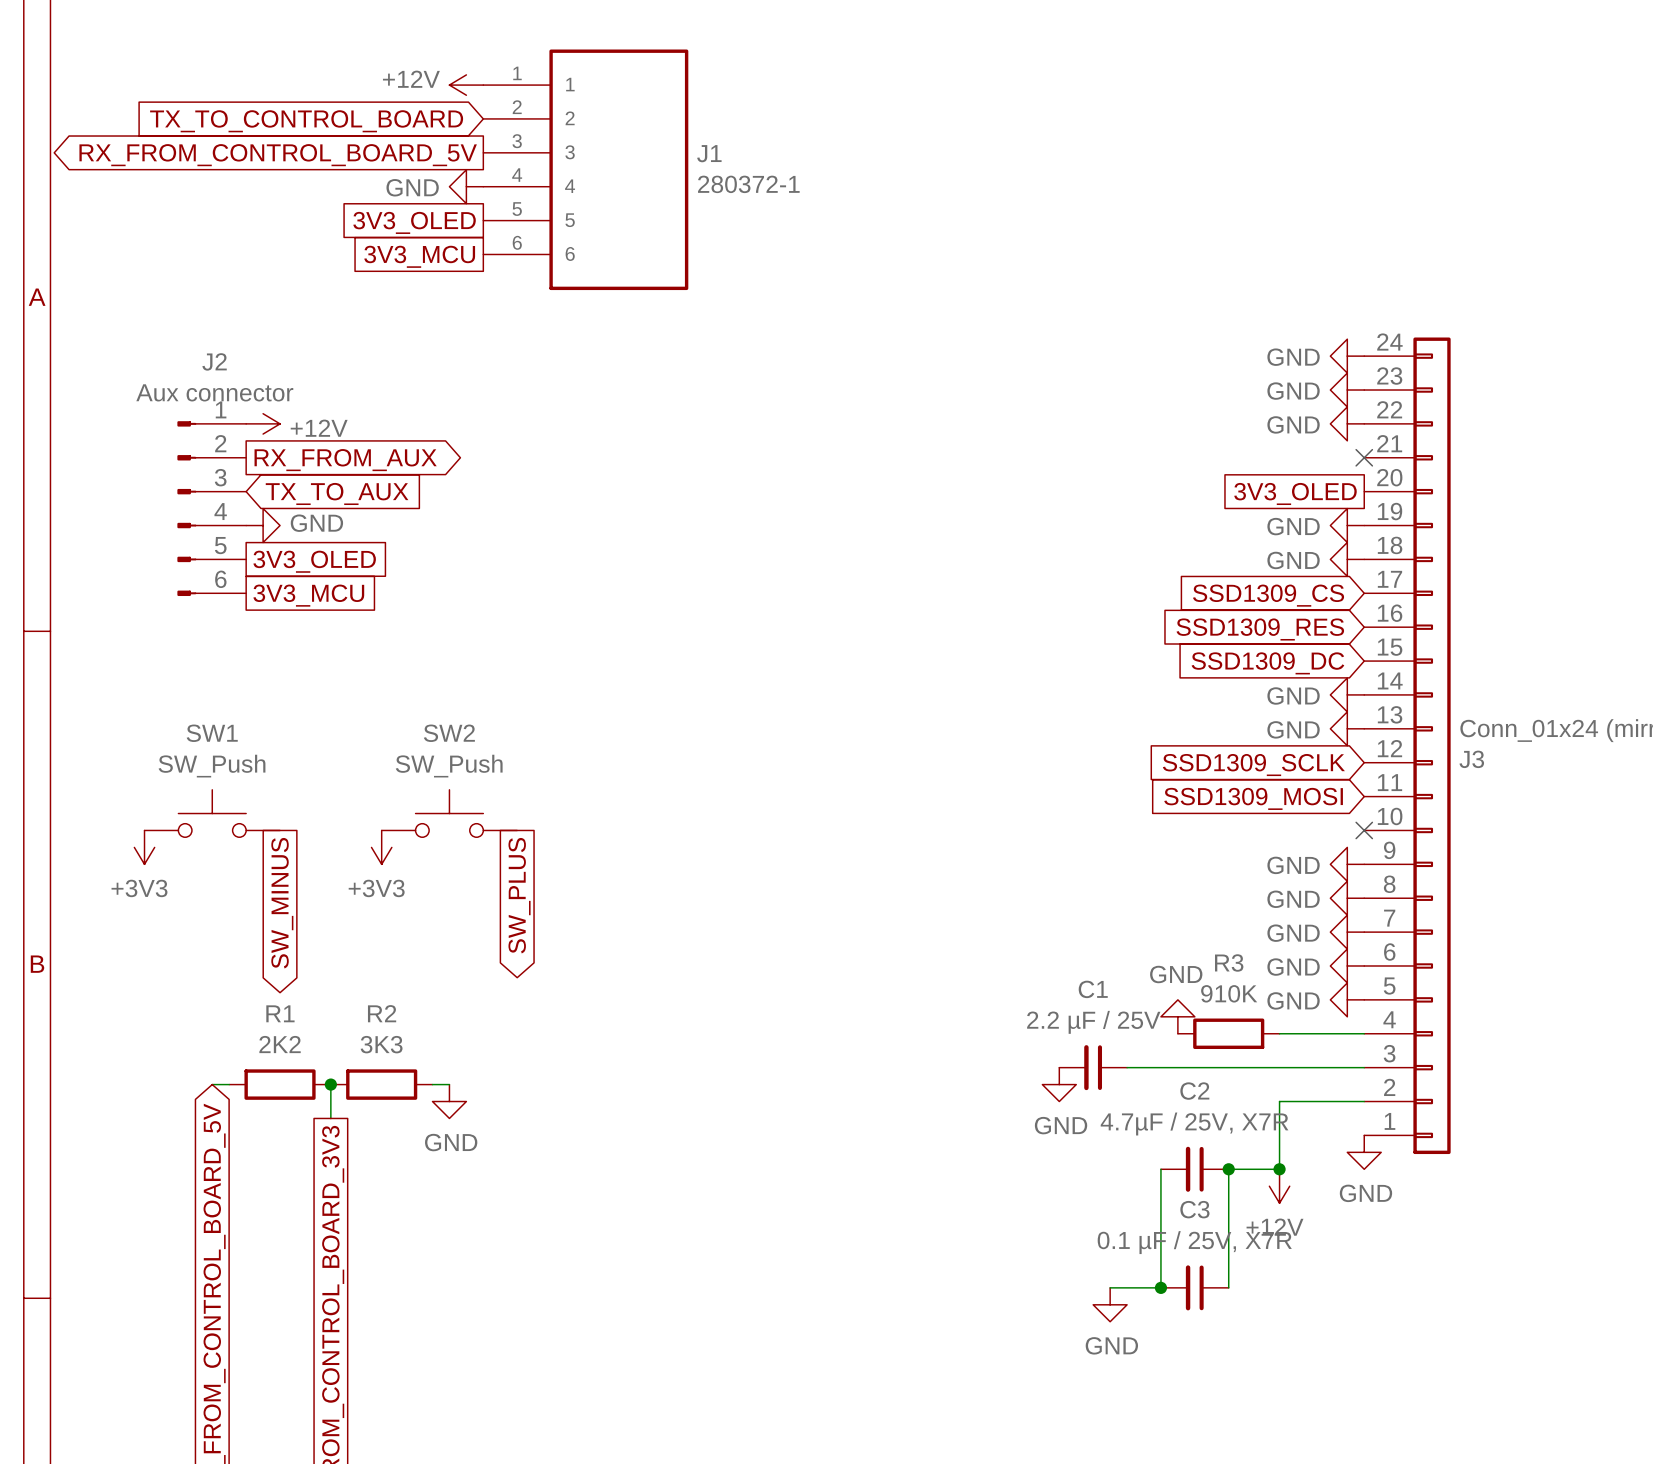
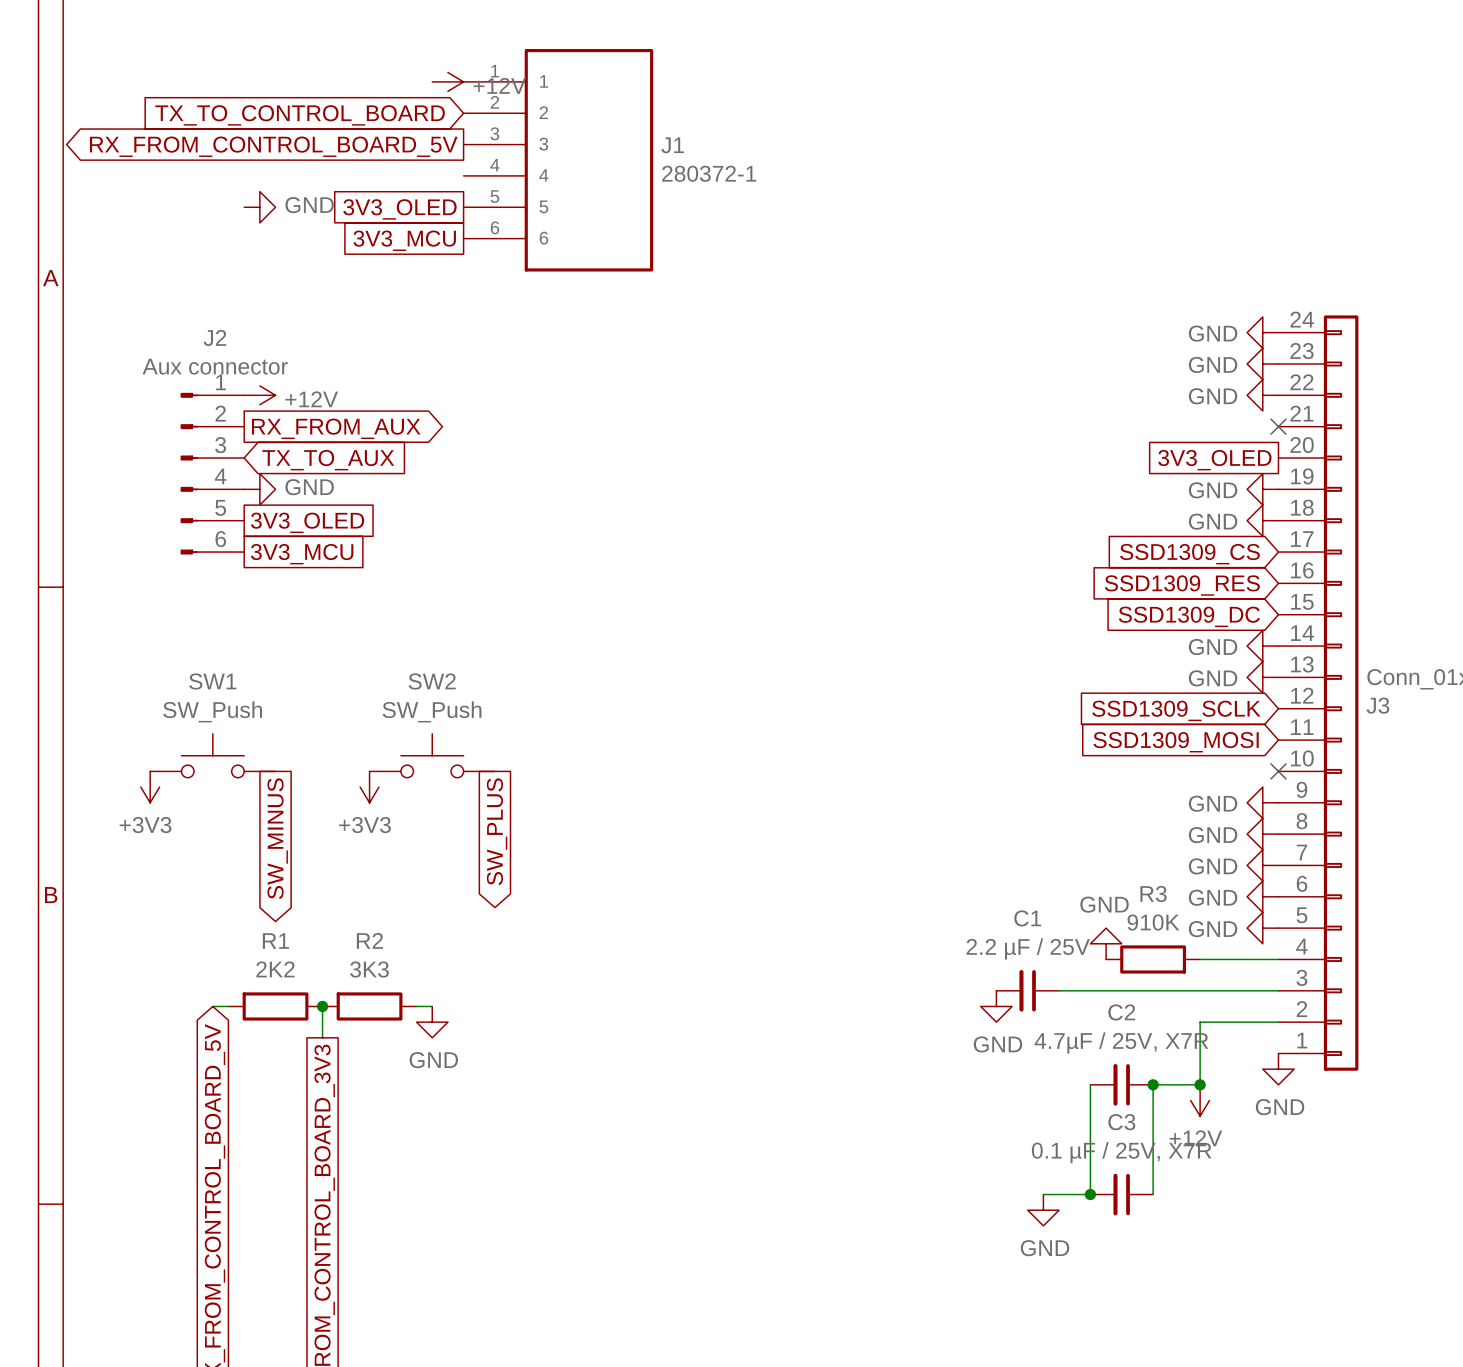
power symbol rotation: 0° (466, 85) -> 180° (447, 81)
power symbol rotation: 0° (466, 186) -> 180° (259, 207)
power symbol position: GND (466, 186) -> GND (259, 207)

